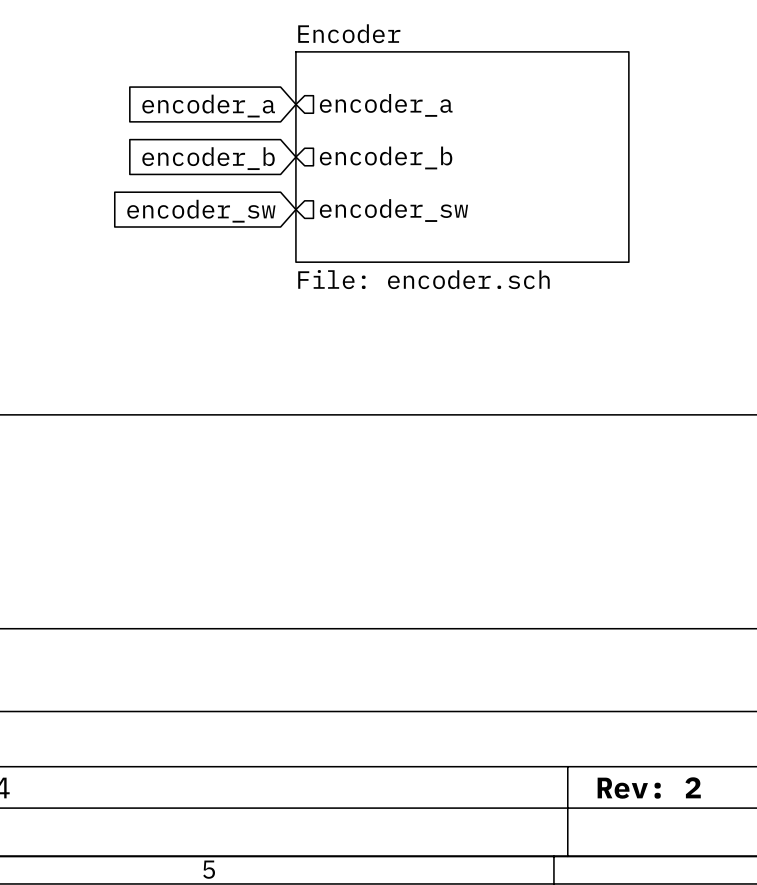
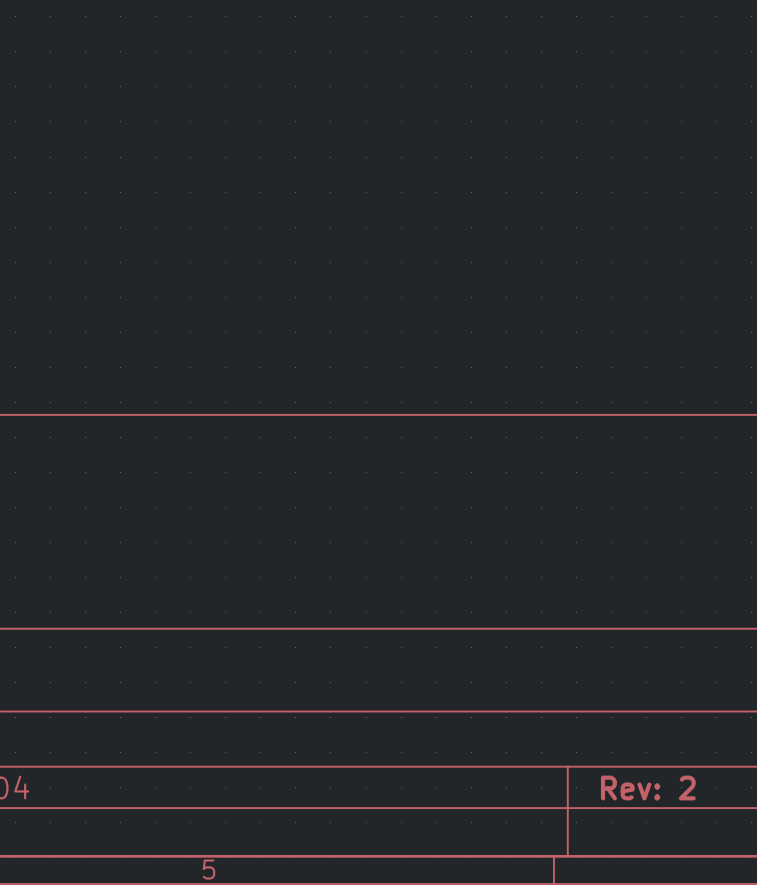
sheet pin: encoder_a (386, 105) -> none
global label: encoder_a (208, 106) -> none
sheet pin: encoder_b (386, 157) -> none
sheet Encoder: File: encoder.sch (462, 157) -> none
global label: encoder_b (208, 158) -> none
sheet pin: encoder_sw (393, 210) -> none
global label: encoder_sw (201, 211) -> none

